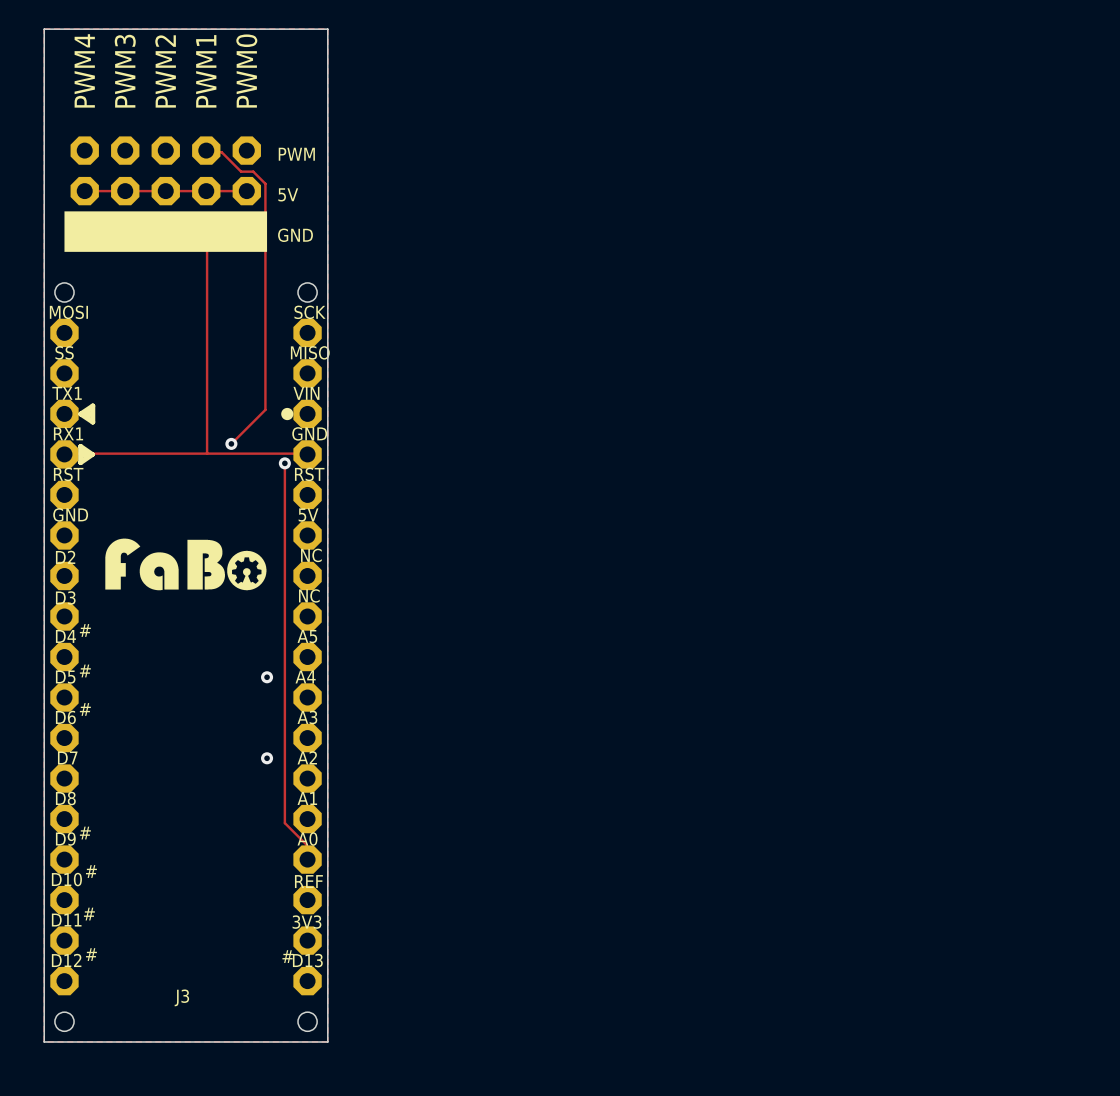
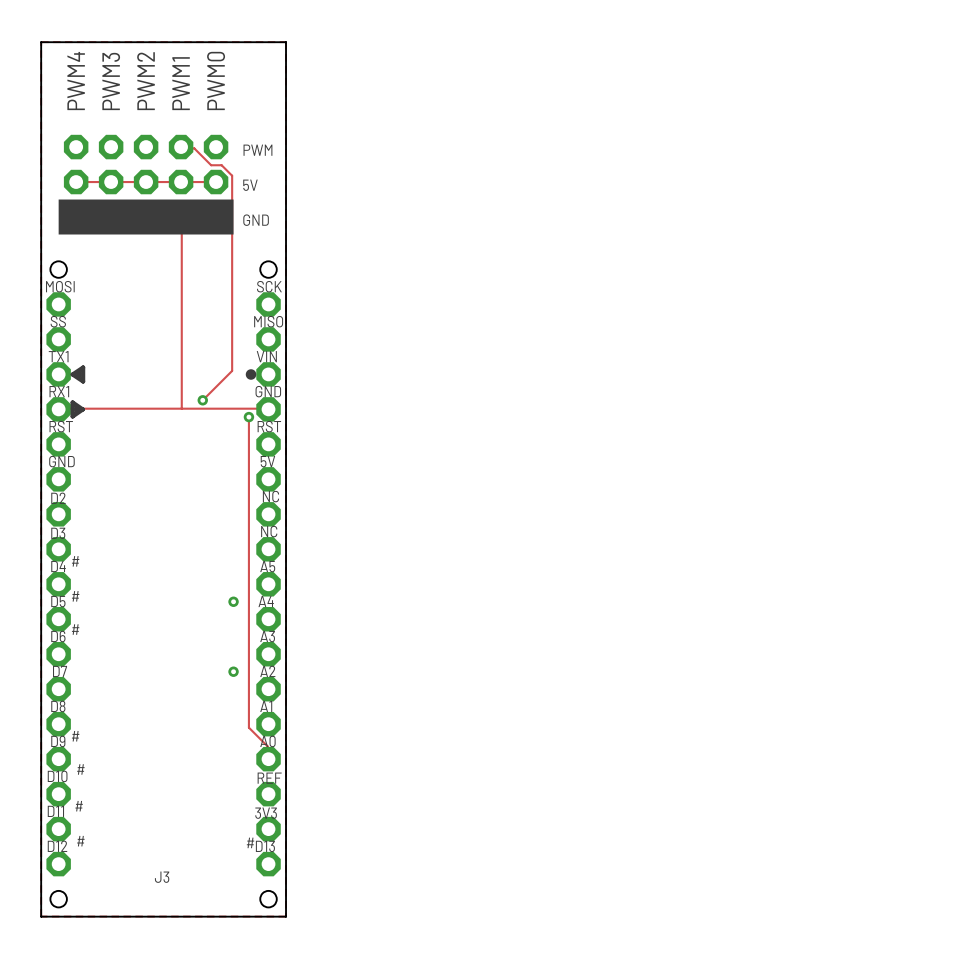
drawing: [105, 538, 267, 591] -> none

